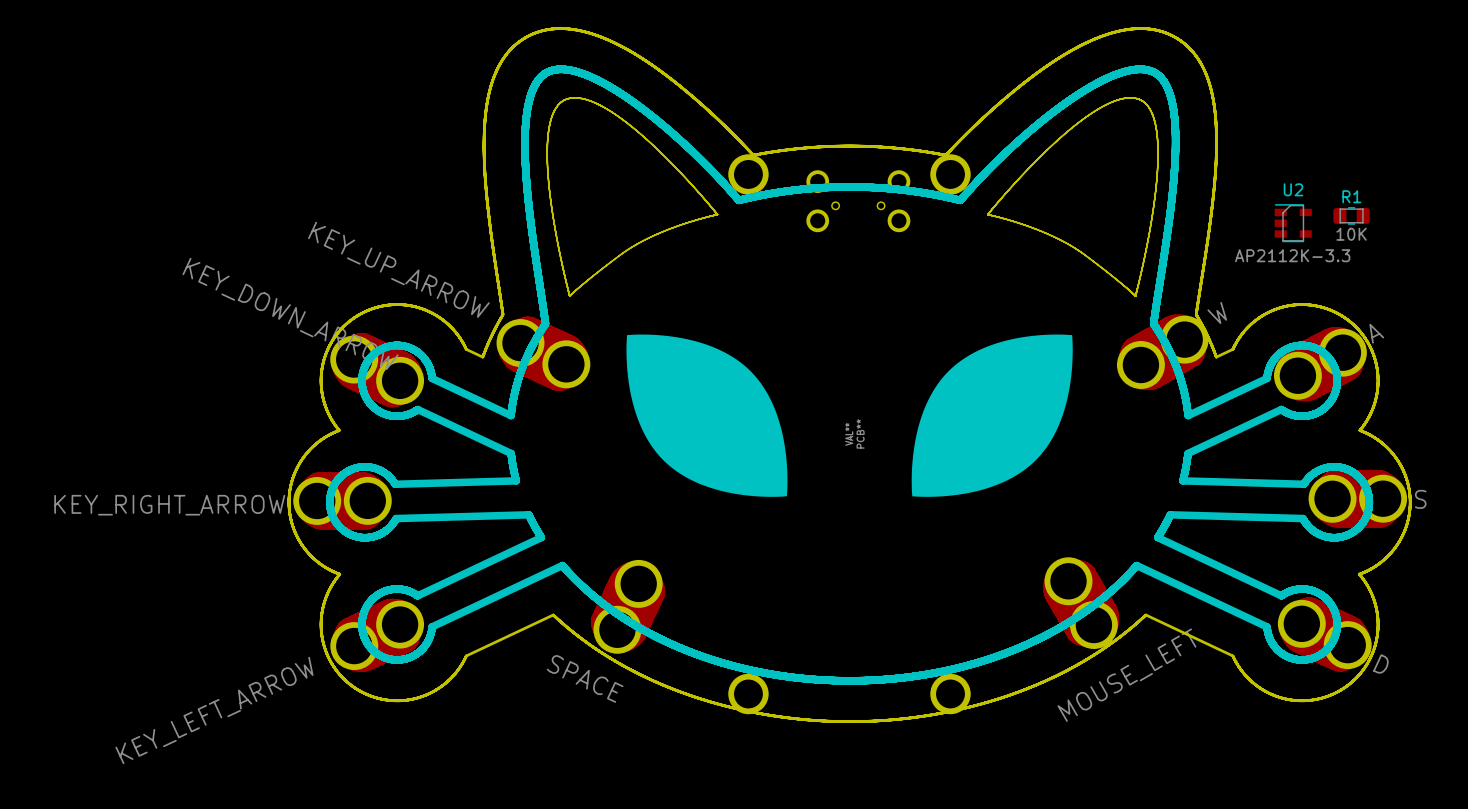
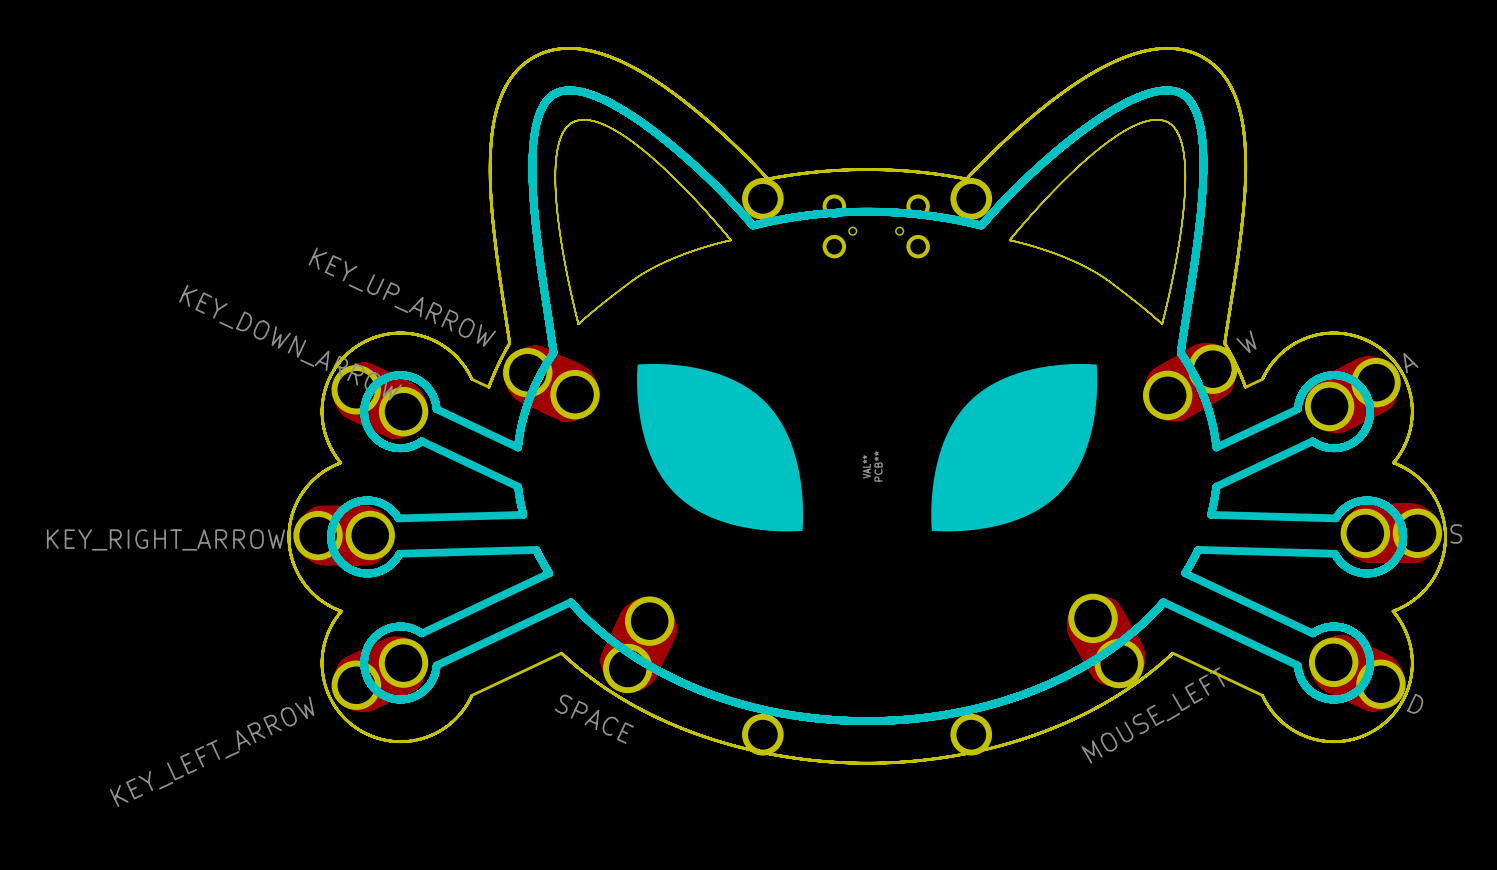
R1: 10K (1351, 215) -> none
U2: AP2112K-3.3 (1293, 223) -> none

